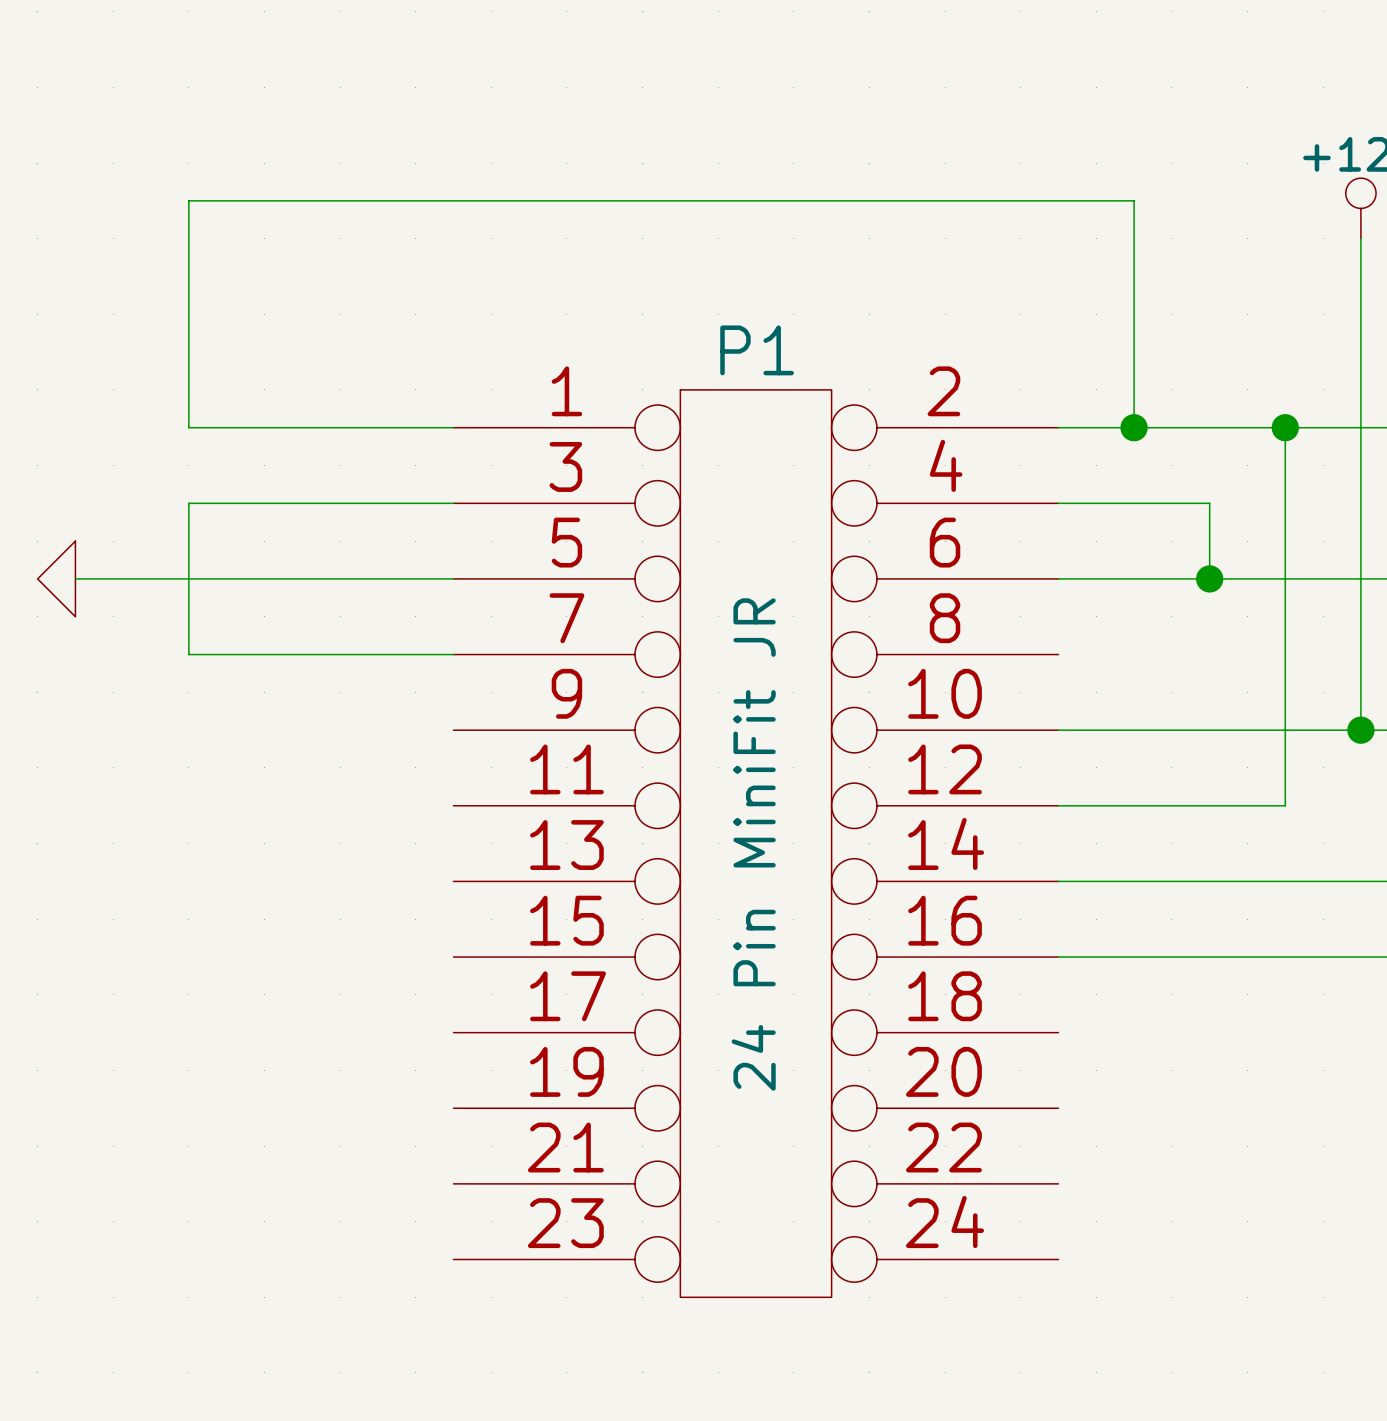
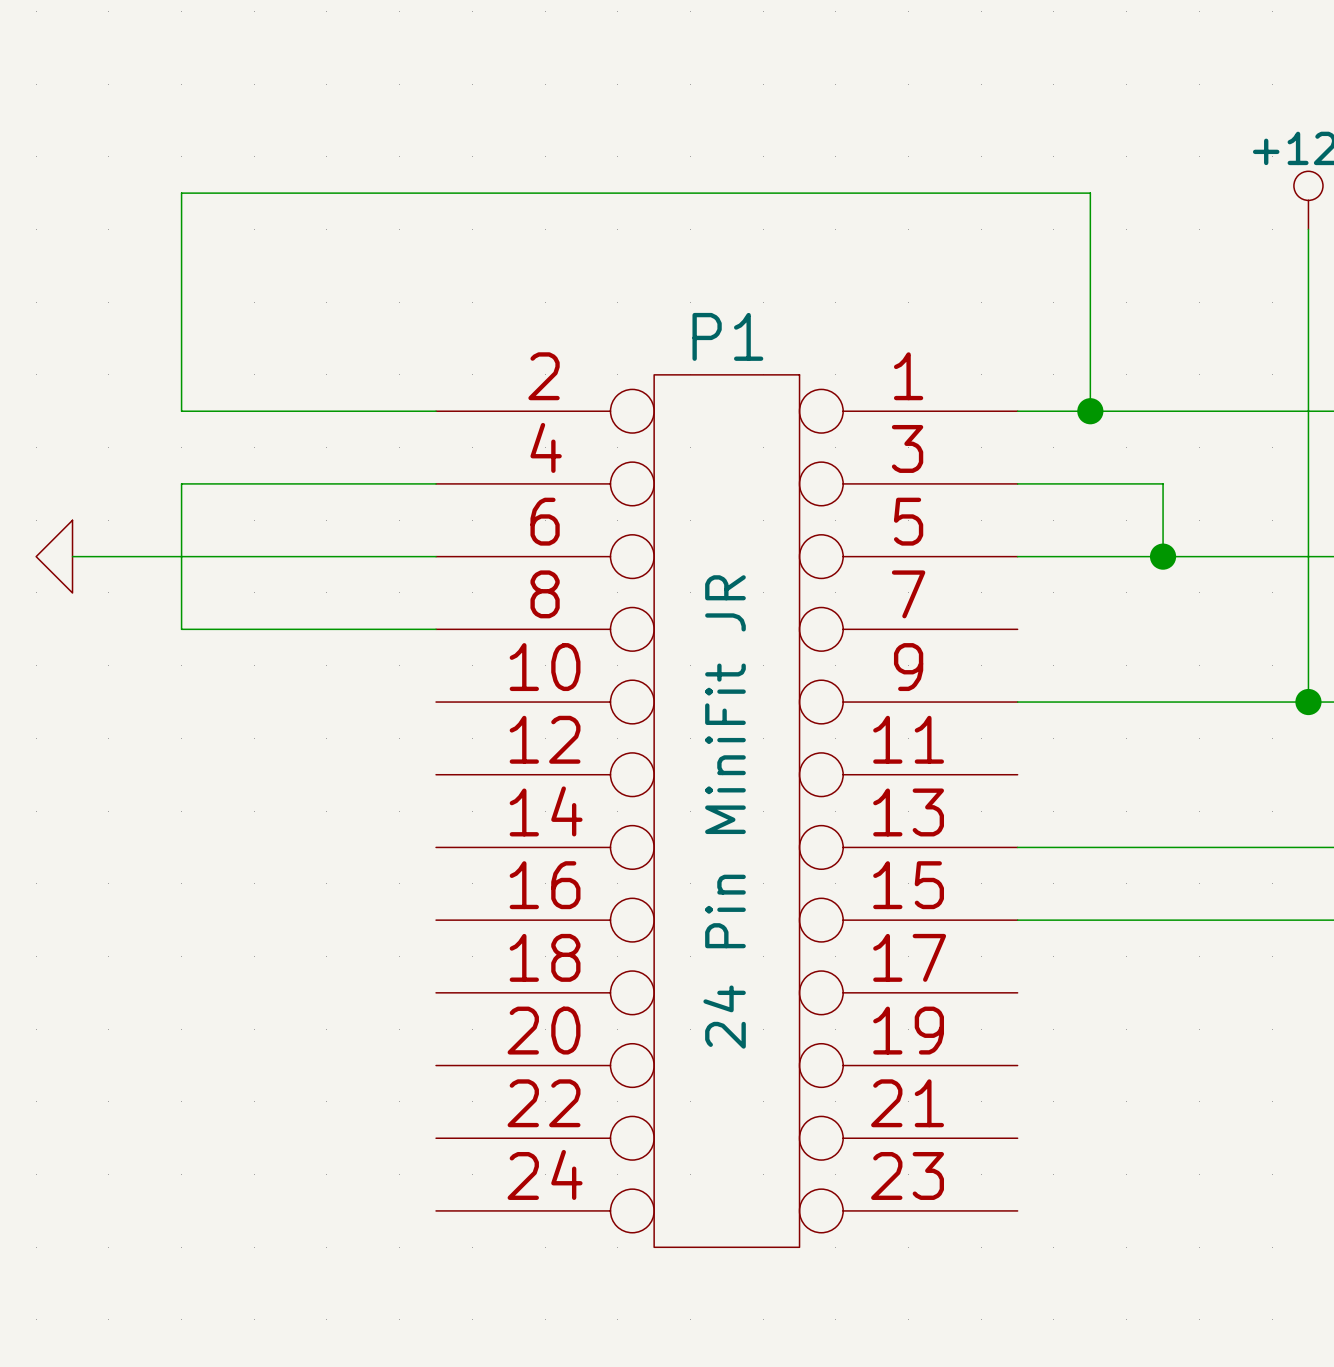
wire: (1285, 427) (1285, 805) (1058, 805) -> none
junction: (1285, 427) -> none
P1 flip: as is (755, 843) -> left-right (726, 811)

